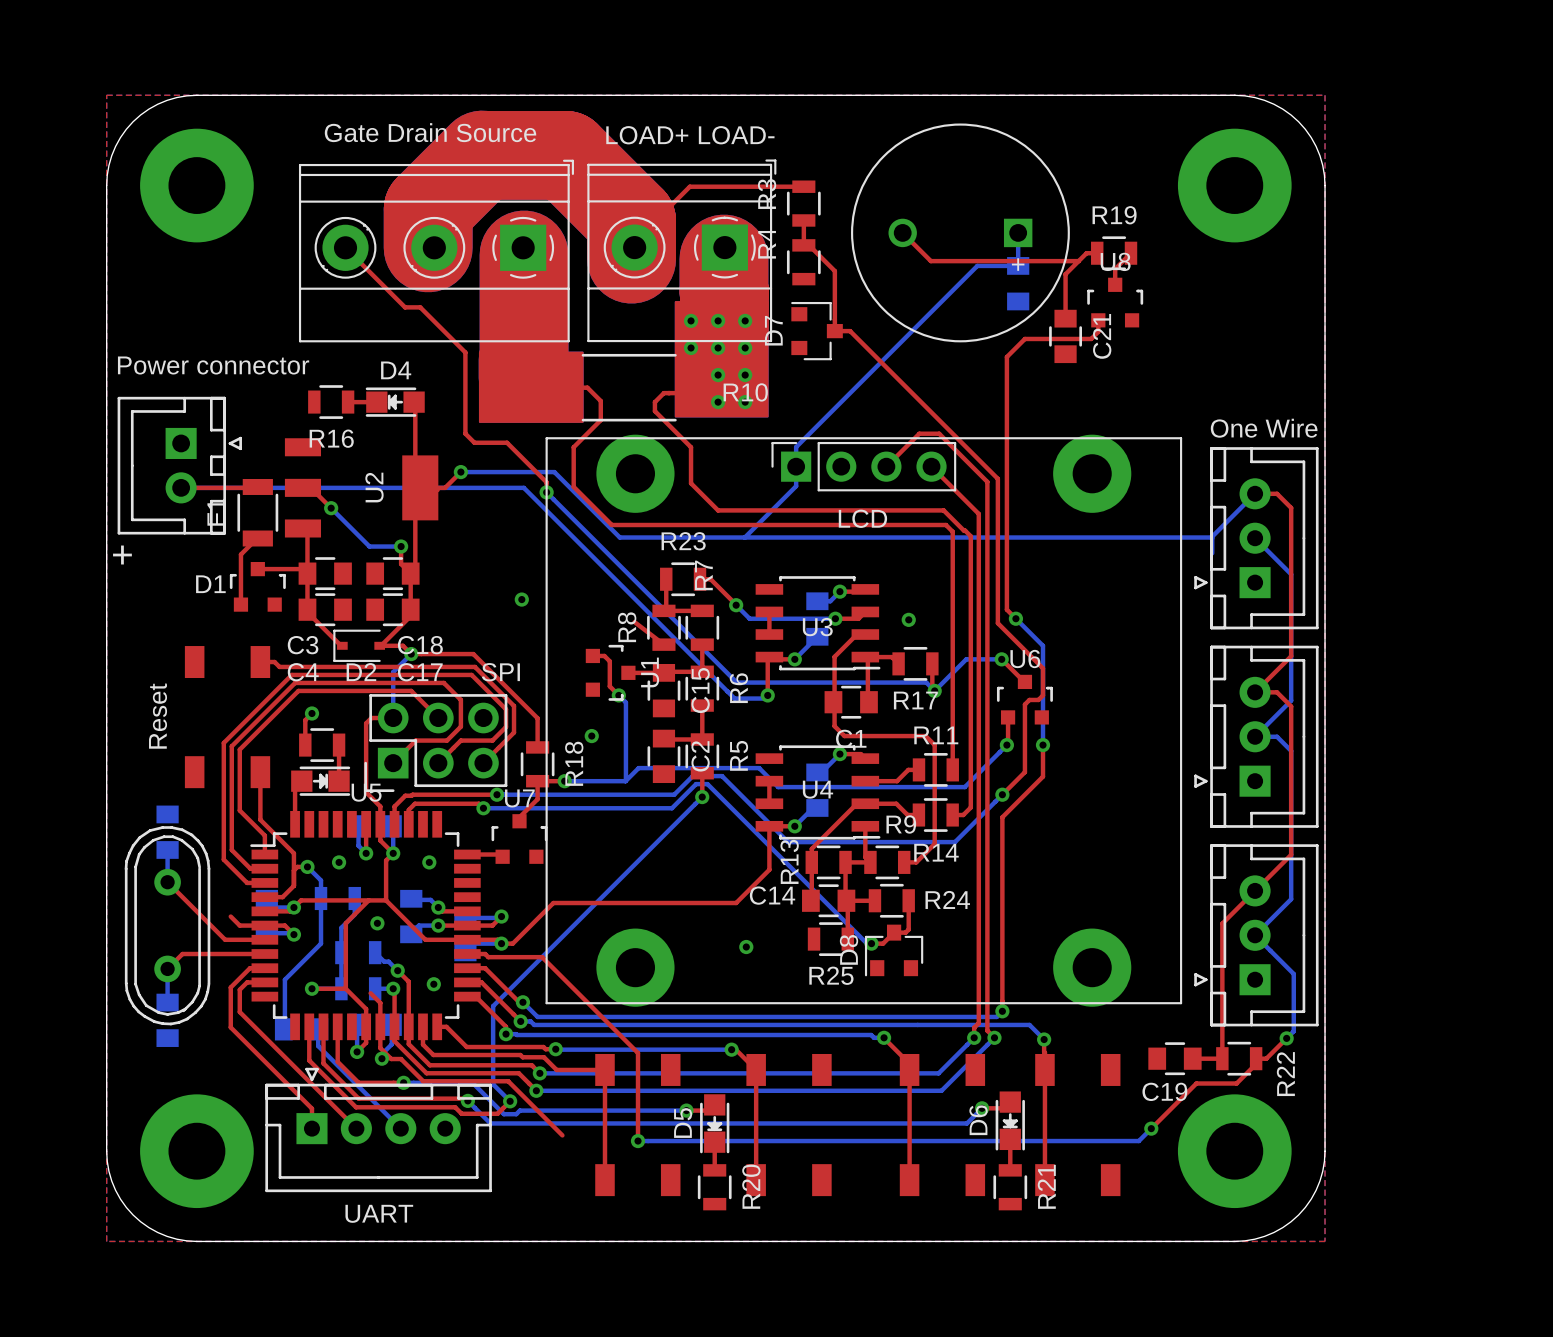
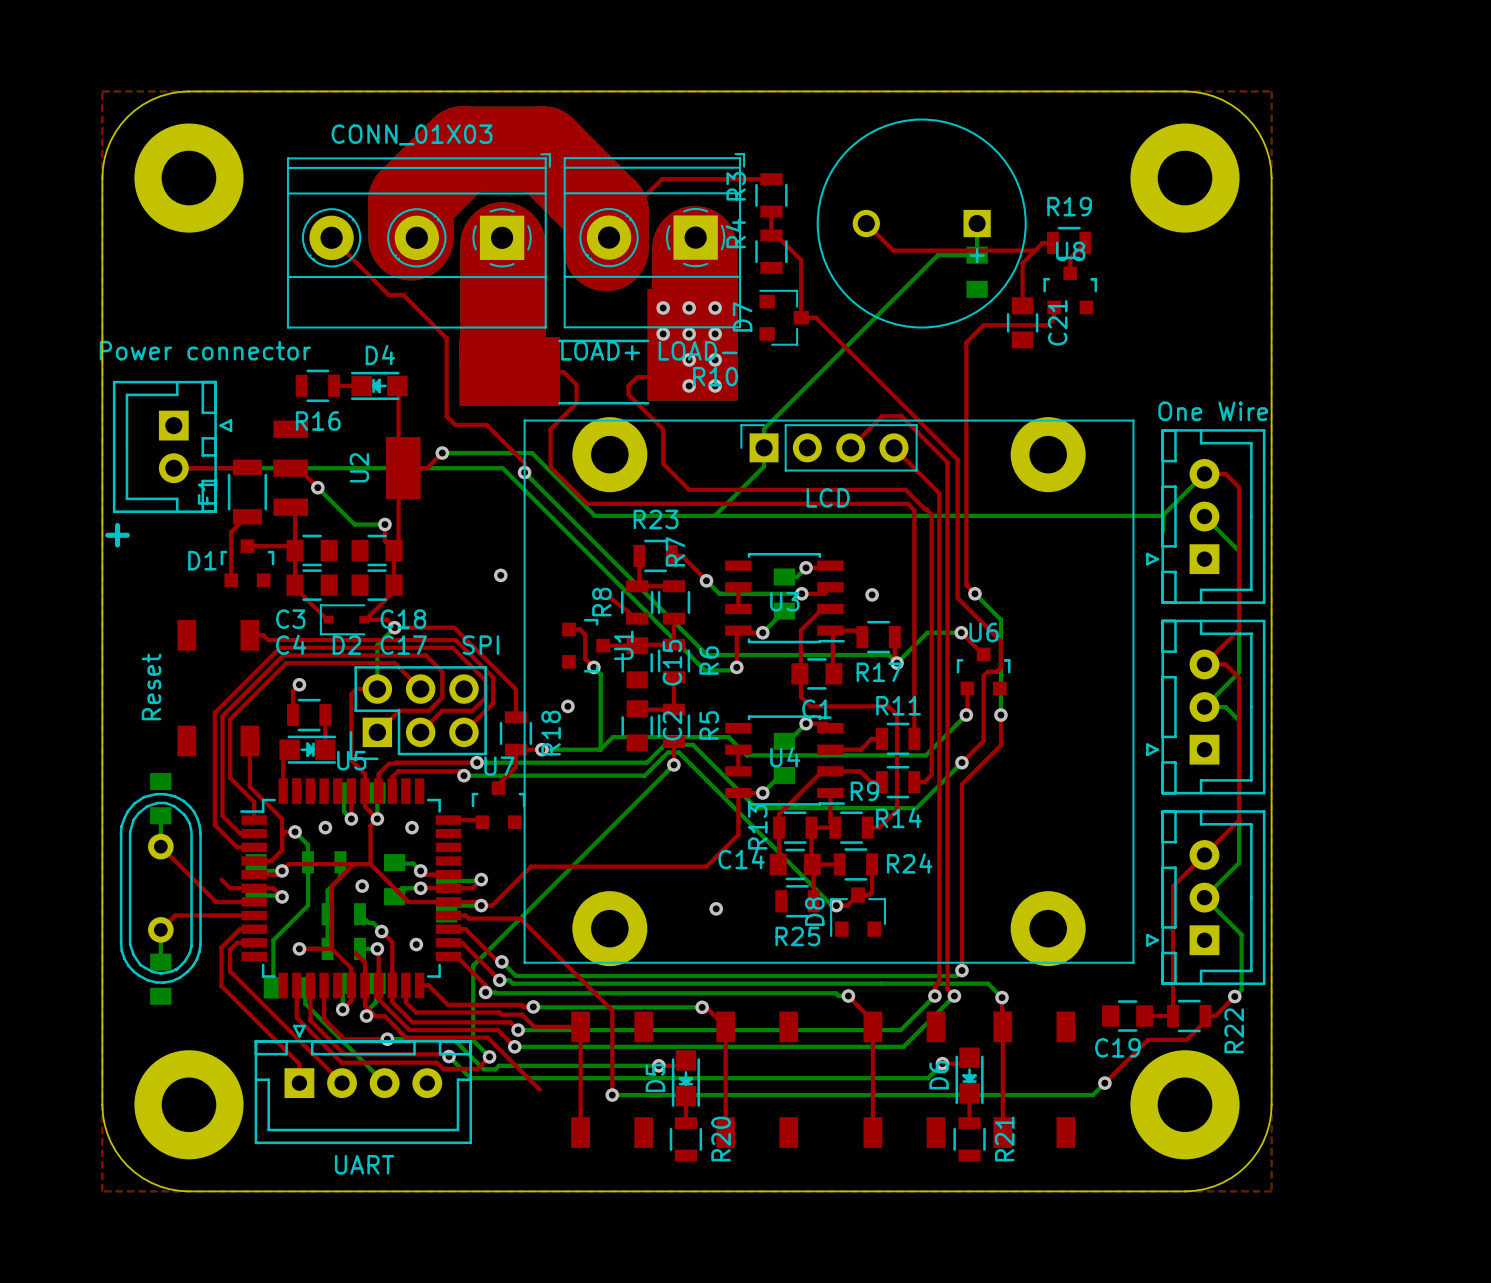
part value: Gate Drain Source (430, 132) -> CONN_01X03 (412, 134)
part text position: LOAD+ LOAD- (690, 135) -> LOAD+ LOAD- (649, 350)

